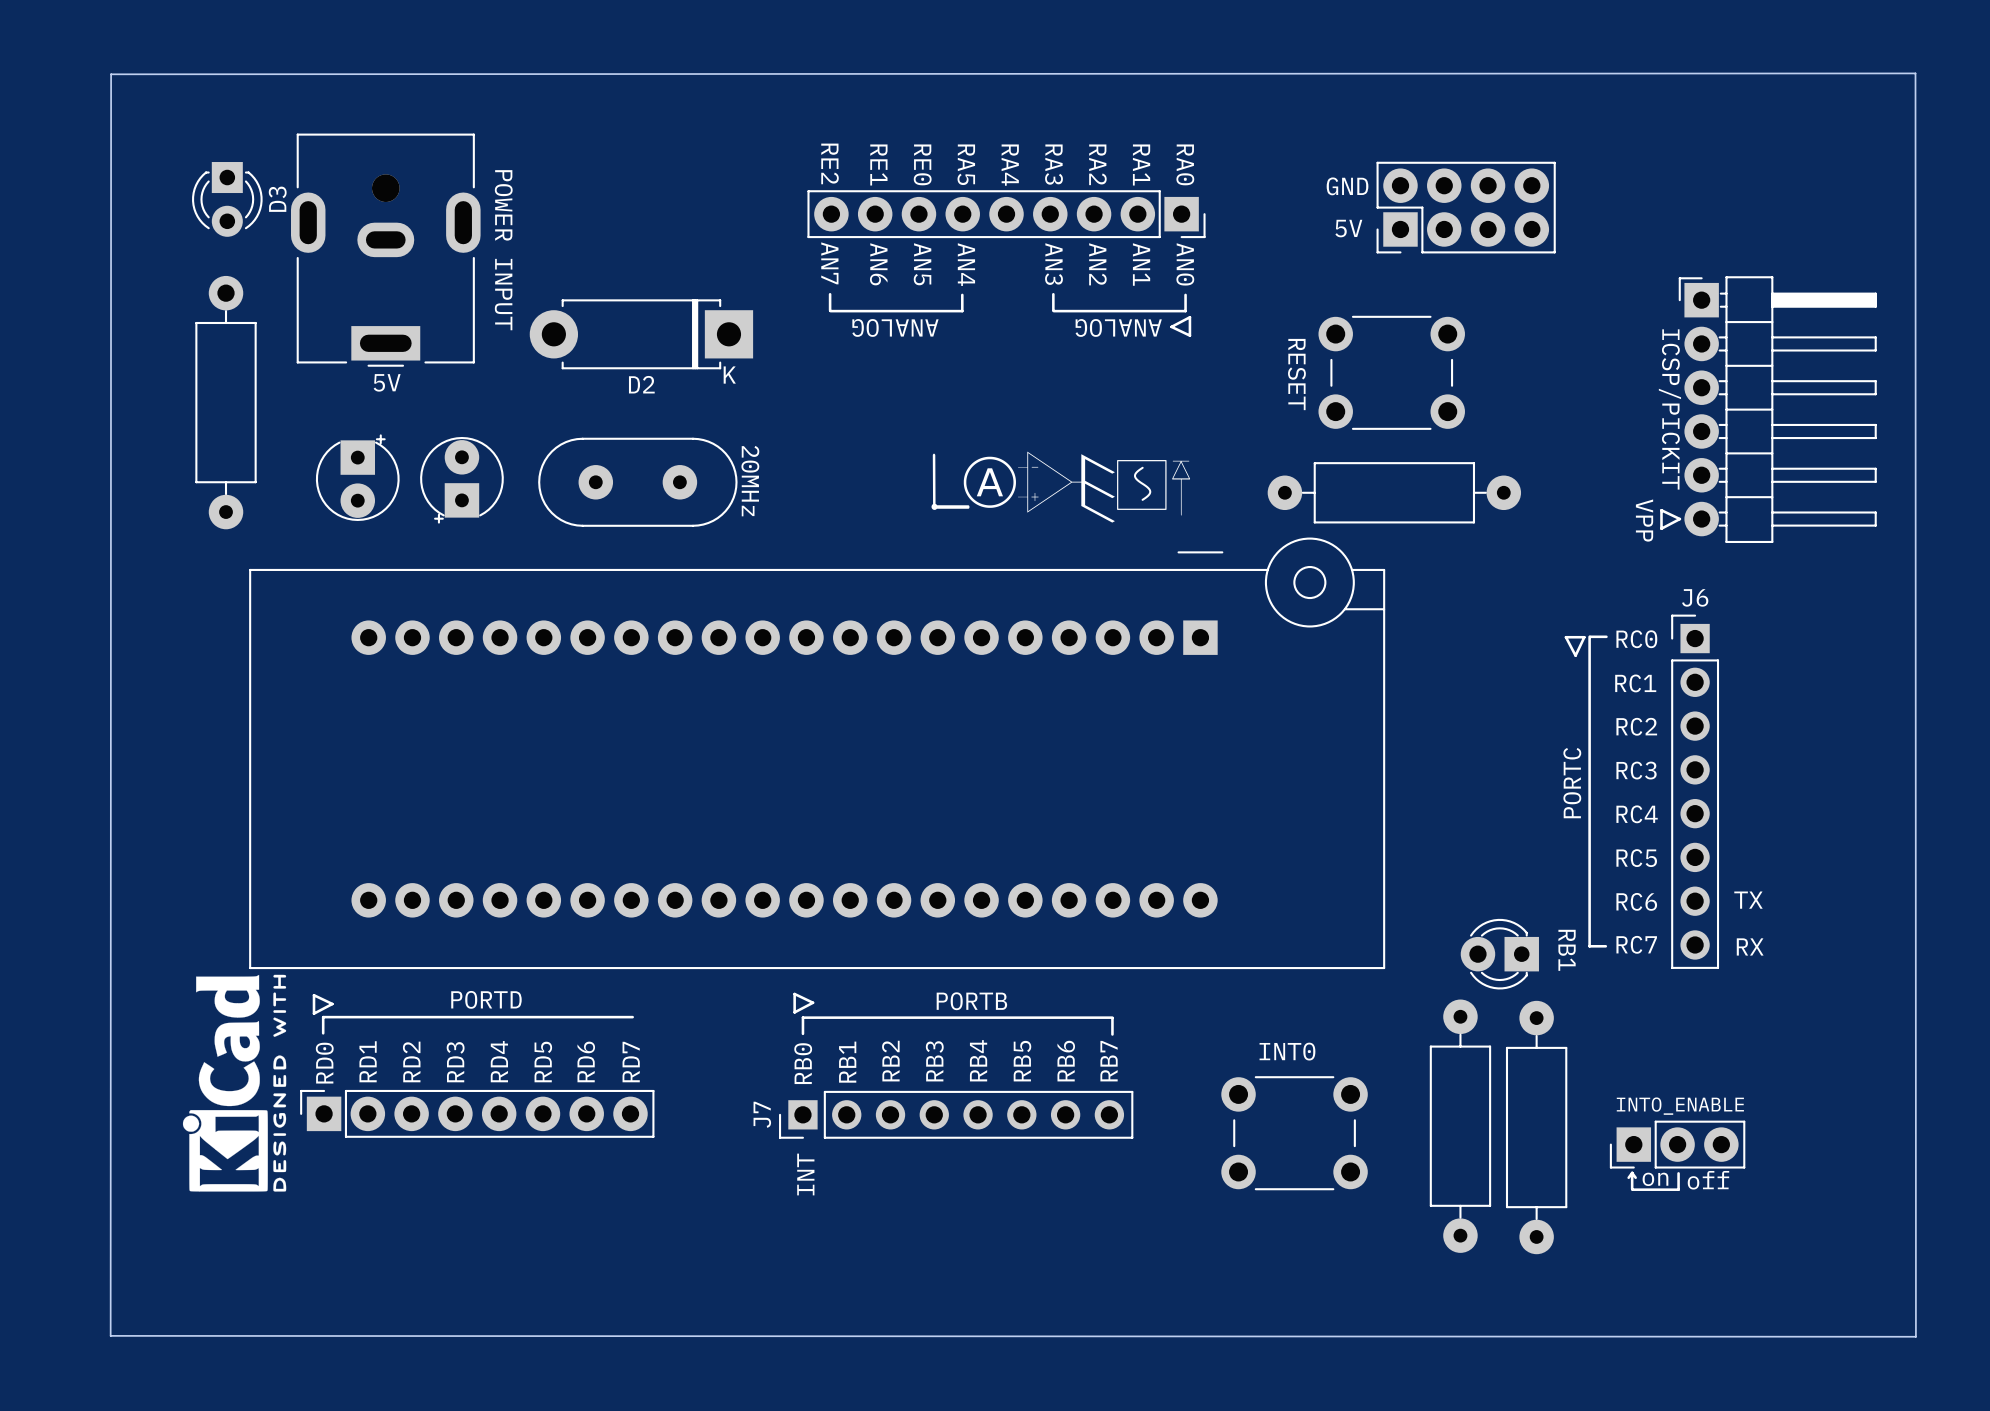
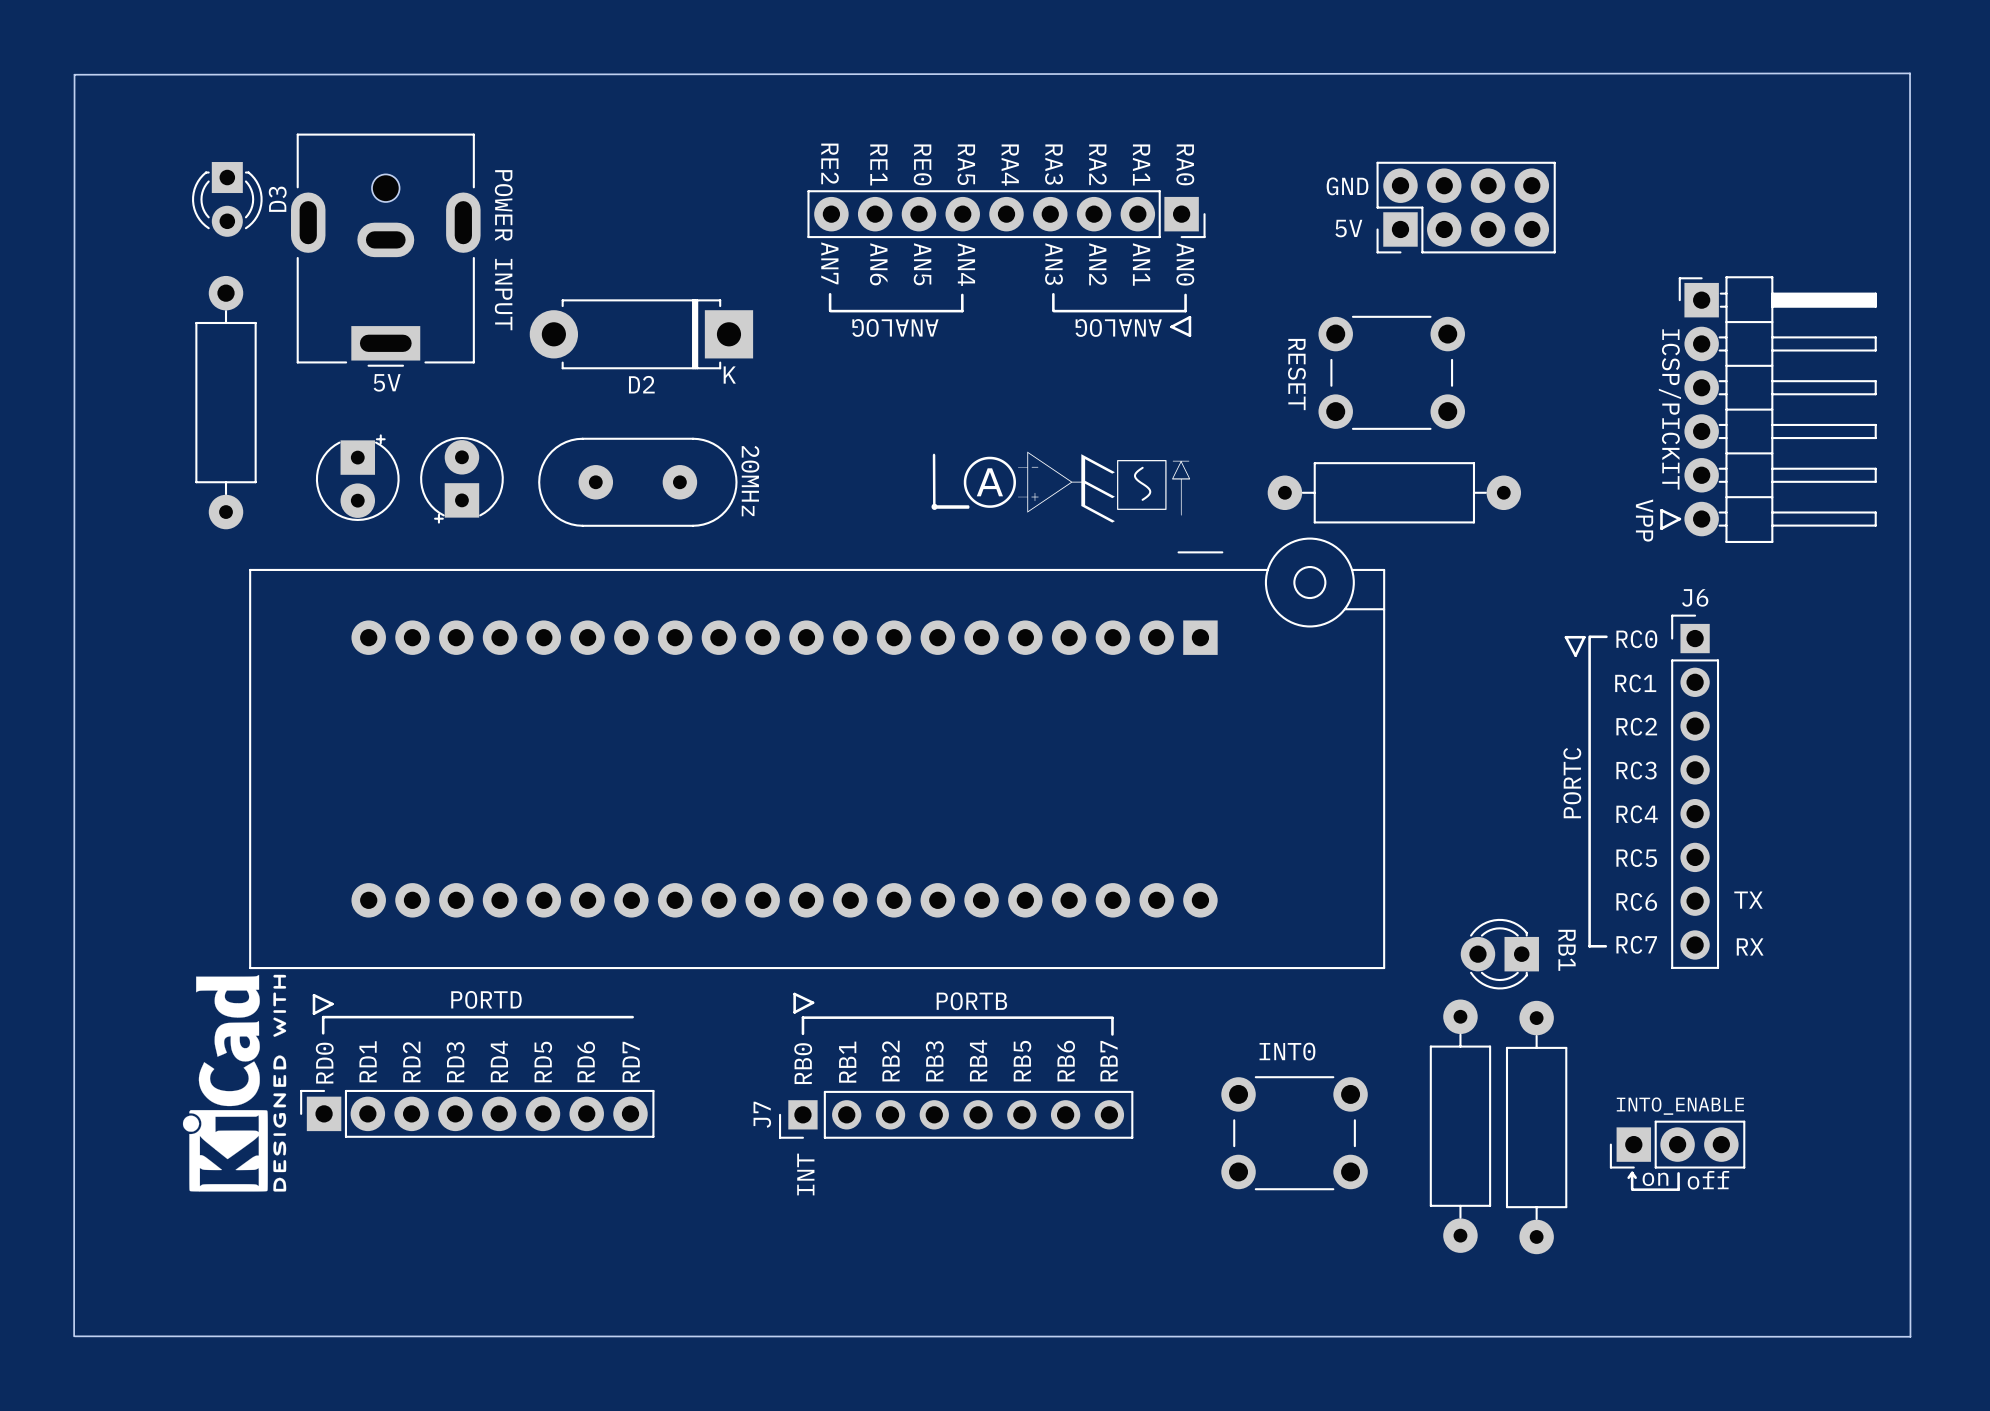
board edge: (1915, 73) (1915, 1336) (110, 1335) (111, 74) (1915, 73) -> none
part footprint: [290, 133, 481, 367] -> [290, 133, 481, 367]
board edge: none -> (74, 1336) (74, 74) (1910, 73) (1910, 1336) (74, 1336)

